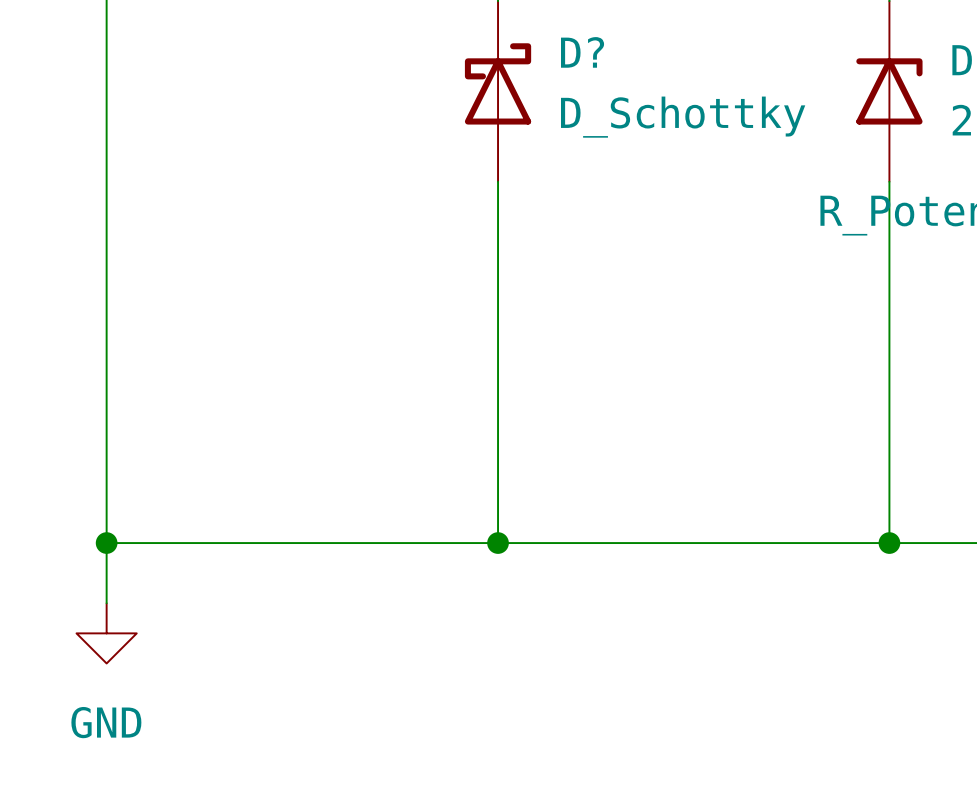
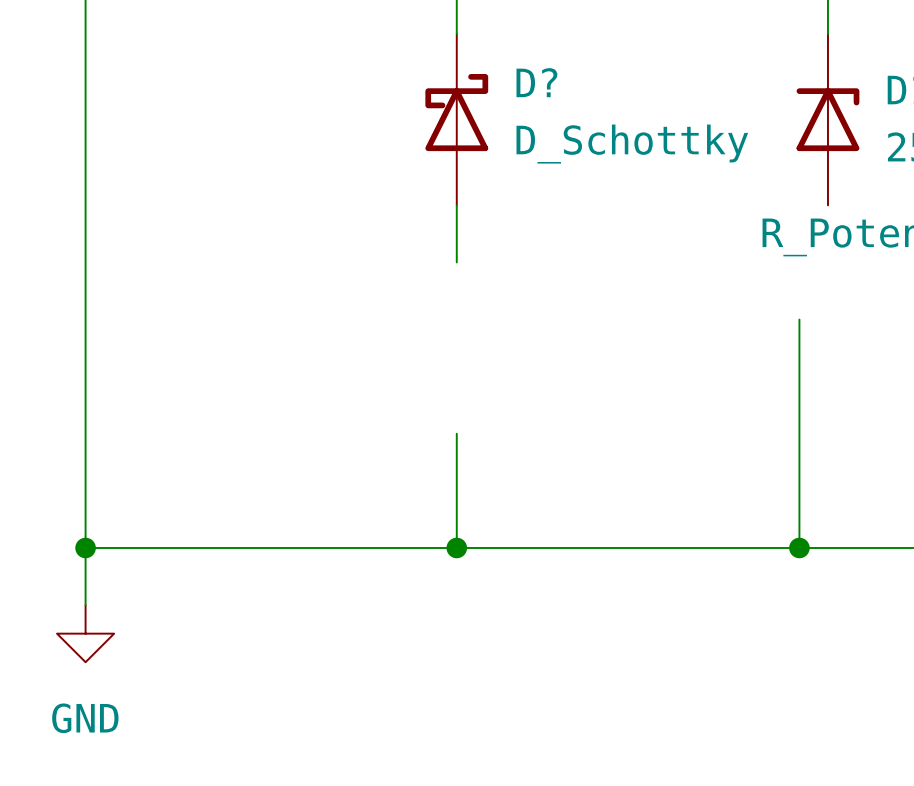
wire: (889, 181) (889, 543) -> none
wire: (498, 241) (498, 422) -> none
wire: none -> (799, 319) (799, 547)
junction position: (889, 543) -> (799, 547)

